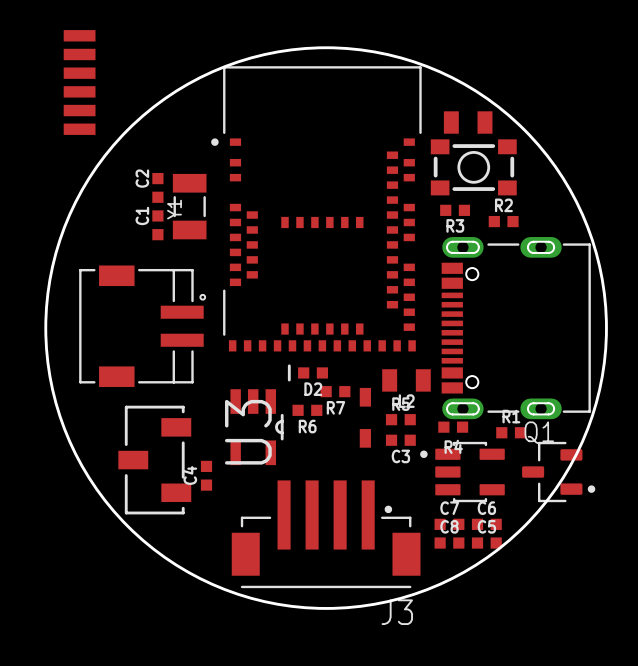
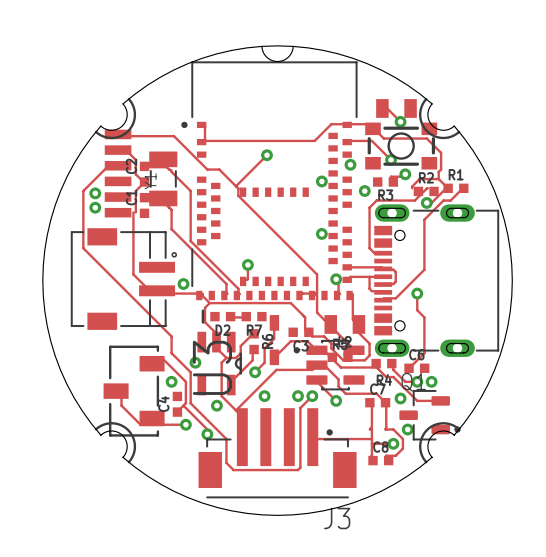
round board edge: [44, 46, 608, 610] -> none
board edge: none -> (261, 46) (266, 57) (277, 61) (288, 57) (293, 46)
part position: (79, 82) -> (118, 173)
line: none -> (128, 99) (133, 106) (134, 115) (133, 123) (128, 131) (120, 136) (112, 138) (103, 136) (96, 131)
line: none -> (426, 99) (421, 106) (420, 115) (422, 123) (426, 131) (434, 136) (442, 138) (451, 136) (459, 131)
board edge: none -> (122, 103) (160, 77) (202, 58) (246, 47) (292, 46) (338, 53) (381, 70) (407, 85) (432, 103) (427, 114) (429, 120) (433, 127) (443, 130) (454, 126) (480, 163) (499, 205) (510, 250) (511, 295) (504, 341) (488, 384) (472, 410) (454, 435) (443, 430) (437, 432) (431, 437) (427, 446) (432, 457) (394, 484) (352, 502) (308, 513) (262, 514) (216, 507) (173, 491) (147, 475) (122, 457) (127, 446) (125, 440) (121, 434) (111, 430) (100, 435) (74, 397) (55, 355) (44, 311) (43, 265) (50, 219) (66, 176) (82, 150) (100, 126) (111, 130) (117, 129) (123, 124) (127, 114) (122, 103)
track: none -> (385, 106) (400, 121)
via: none -> (400, 121)
track: none -> (204, 123) (204, 140) (314, 140) (331, 124) (369, 124) (383, 138) (426, 138) (441, 152) (441, 169) (438, 171) (438, 179)
track: none -> (118, 134) (119, 136) (173, 136) (207, 169) (219, 169) (238, 188) (238, 195) (317, 274) (317, 293) (315, 293)
track: none -> (350, 140) (371, 140) (391, 160)
track: none -> (118, 150) (126, 150) (135, 160) (135, 174) (144, 182) (135, 191) (135, 212)
track: none -> (267, 155) (235, 186)
via: none -> (267, 155)
via: none -> (391, 160)
C2 position: (157, 187) -> (144, 174)
via: none -> (350, 164)
track: none -> (118, 165) (107, 167) (83, 191) (83, 248) (171, 336) (171, 353) (190, 372) (190, 403) (226, 439) (226, 462) (233, 470) (298, 470) (300, 467) (300, 408) (312, 396)
track: none -> (144, 166) (166, 167) (190, 191) (190, 241) (238, 288) (239, 293)
track: none -> (405, 174) (402, 176) (391, 176) (390, 178)
via: none -> (405, 174)
track: none -> (438, 179) (419, 179) (412, 188)
track: none -> (438, 179) (448, 188) (431, 202) (426, 202)
via: none -> (321, 181)
track: none -> (427, 188) (414, 200) (376, 200) (369, 207) (369, 248) (374, 253) (383, 253)
track: none -> (463, 188) (450, 200) (443, 200) (424, 219) (424, 269) (395, 298) (383, 298) (383, 300)
via: none -> (364, 191)
via: none -> (95, 193)
C1 position: (157, 225) -> (144, 205)
track: none -> (144, 197) (159, 198) (171, 209) (171, 229) (226, 284) (227, 293)
via: none -> (426, 202)
via: none -> (95, 207)
track: none -> (133, 212) (133, 274) (147, 288) (154, 288) (159, 293) (202, 293) (209, 303)
via: none -> (321, 233)
track: none -> (247, 264) (247, 279) (246, 279)
via: none -> (247, 264)
track: none -> (350, 265) (350, 267) (381, 267) (383, 269) (393, 269) (395, 272) (395, 281) (393, 284) (383, 284)
track: none -> (369, 276) (369, 288) (371, 291) (383, 292)
track: none -> (383, 276) (350, 278)
track: none -> (336, 279) (338, 281) (338, 293) (340, 293)
via: none -> (336, 279)
via: none -> (183, 284)
track: none -> (302, 293) (315, 293)
track: none -> (315, 293) (317, 295) (317, 312) (354, 350)
track: none -> (352, 293) (352, 319) (355, 322) (355, 329) (369, 343) (369, 355) (364, 360) (343, 360) (331, 348) (331, 343) (324, 336) (312, 336) (305, 329) (305, 317) (290, 303) (209, 303)
track: none -> (417, 293) (417, 310) (424, 317) (424, 353) (409, 368)
via: none -> (417, 293)
track: none -> (209, 303) (204, 307) (204, 322) (214, 331) (216, 348) (226, 357)
track: none -> (230, 316) (246, 316)
D2 position: (307, 372) -> (218, 316)
track: none -> (274, 322) (274, 338) (264, 348) (264, 362) (255, 372)
track: none -> (254, 333) (240, 346) (240, 353) (235, 357) (226, 357)
R7 position: (335, 391) -> (254, 316)
track: none -> (254, 349) (252, 360) (233, 379) (233, 384) (231, 385)
R6 rotation: 0° (307, 410) -> 90° clockwise (254, 341)
part position: (365, 417) -> (274, 340)
track: none -> (155, 357) (162, 357) (185, 381) (185, 403) (177, 412)
track: none -> (274, 357) (290, 341) (307, 341) (317, 350) (324, 350) (340, 367) (376, 367) (386, 377) (393, 377) (417, 400) (440, 400)
track: none -> (226, 357) (221, 362) (221, 396) (240, 415) (240, 436) (242, 437)
via: none -> (195, 362)
track: none -> (393, 368) (405, 381) (417, 381)
R1 position: (511, 432) -> (455, 188)
via: none -> (255, 372)
C3 position: (400, 440) -> (301, 332)
track: none -> (316, 380) (336, 400)
via: none -> (171, 381)
via: none -> (417, 381)
via: none -> (431, 381)
track: none -> (119, 384) (121, 386) (121, 405) (140, 424) (185, 424)
via: none -> (264, 396)
via: none -> (298, 396)
via: none -> (312, 396)
via: none -> (400, 398)
via: none -> (336, 400)
part position: (462, 472) -> (329, 365)
Q1 position: (558, 472) -> (430, 415)
track: none -> (369, 402) (371, 403) (371, 427) (369, 429) (371, 429) (371, 455) (369, 457)
track: none -> (183, 405) (207, 429) (207, 434)
via: none -> (216, 405)
track: none -> (235, 410) (276, 369) (312, 369) (316, 365) (317, 367) (326, 367) (338, 379) (338, 386) (345, 393) (376, 393) (386, 403) (385, 429) (393, 429) (402, 439) (402, 448) (395, 455) (386, 455) (385, 457)
via: none -> (185, 424)
line: none -> (96, 429) (103, 424) (112, 423) (120, 425) (128, 430) (133, 437) (134, 445) (133, 454) (128, 462)
via: none -> (407, 429)
line: none -> (459, 429) (451, 424) (442, 423) (434, 425) (426, 430) (422, 437) (420, 445) (421, 454) (426, 462)
via: none -> (207, 434)
track: none -> (312, 437) (314, 439) (371, 439)
track: none -> (371, 443) (393, 443)
via: none -> (393, 443)
C7 position: (449, 524) -> (377, 402)
C6 position: (486, 524) -> (416, 368)
C5: (486, 543) -> none

